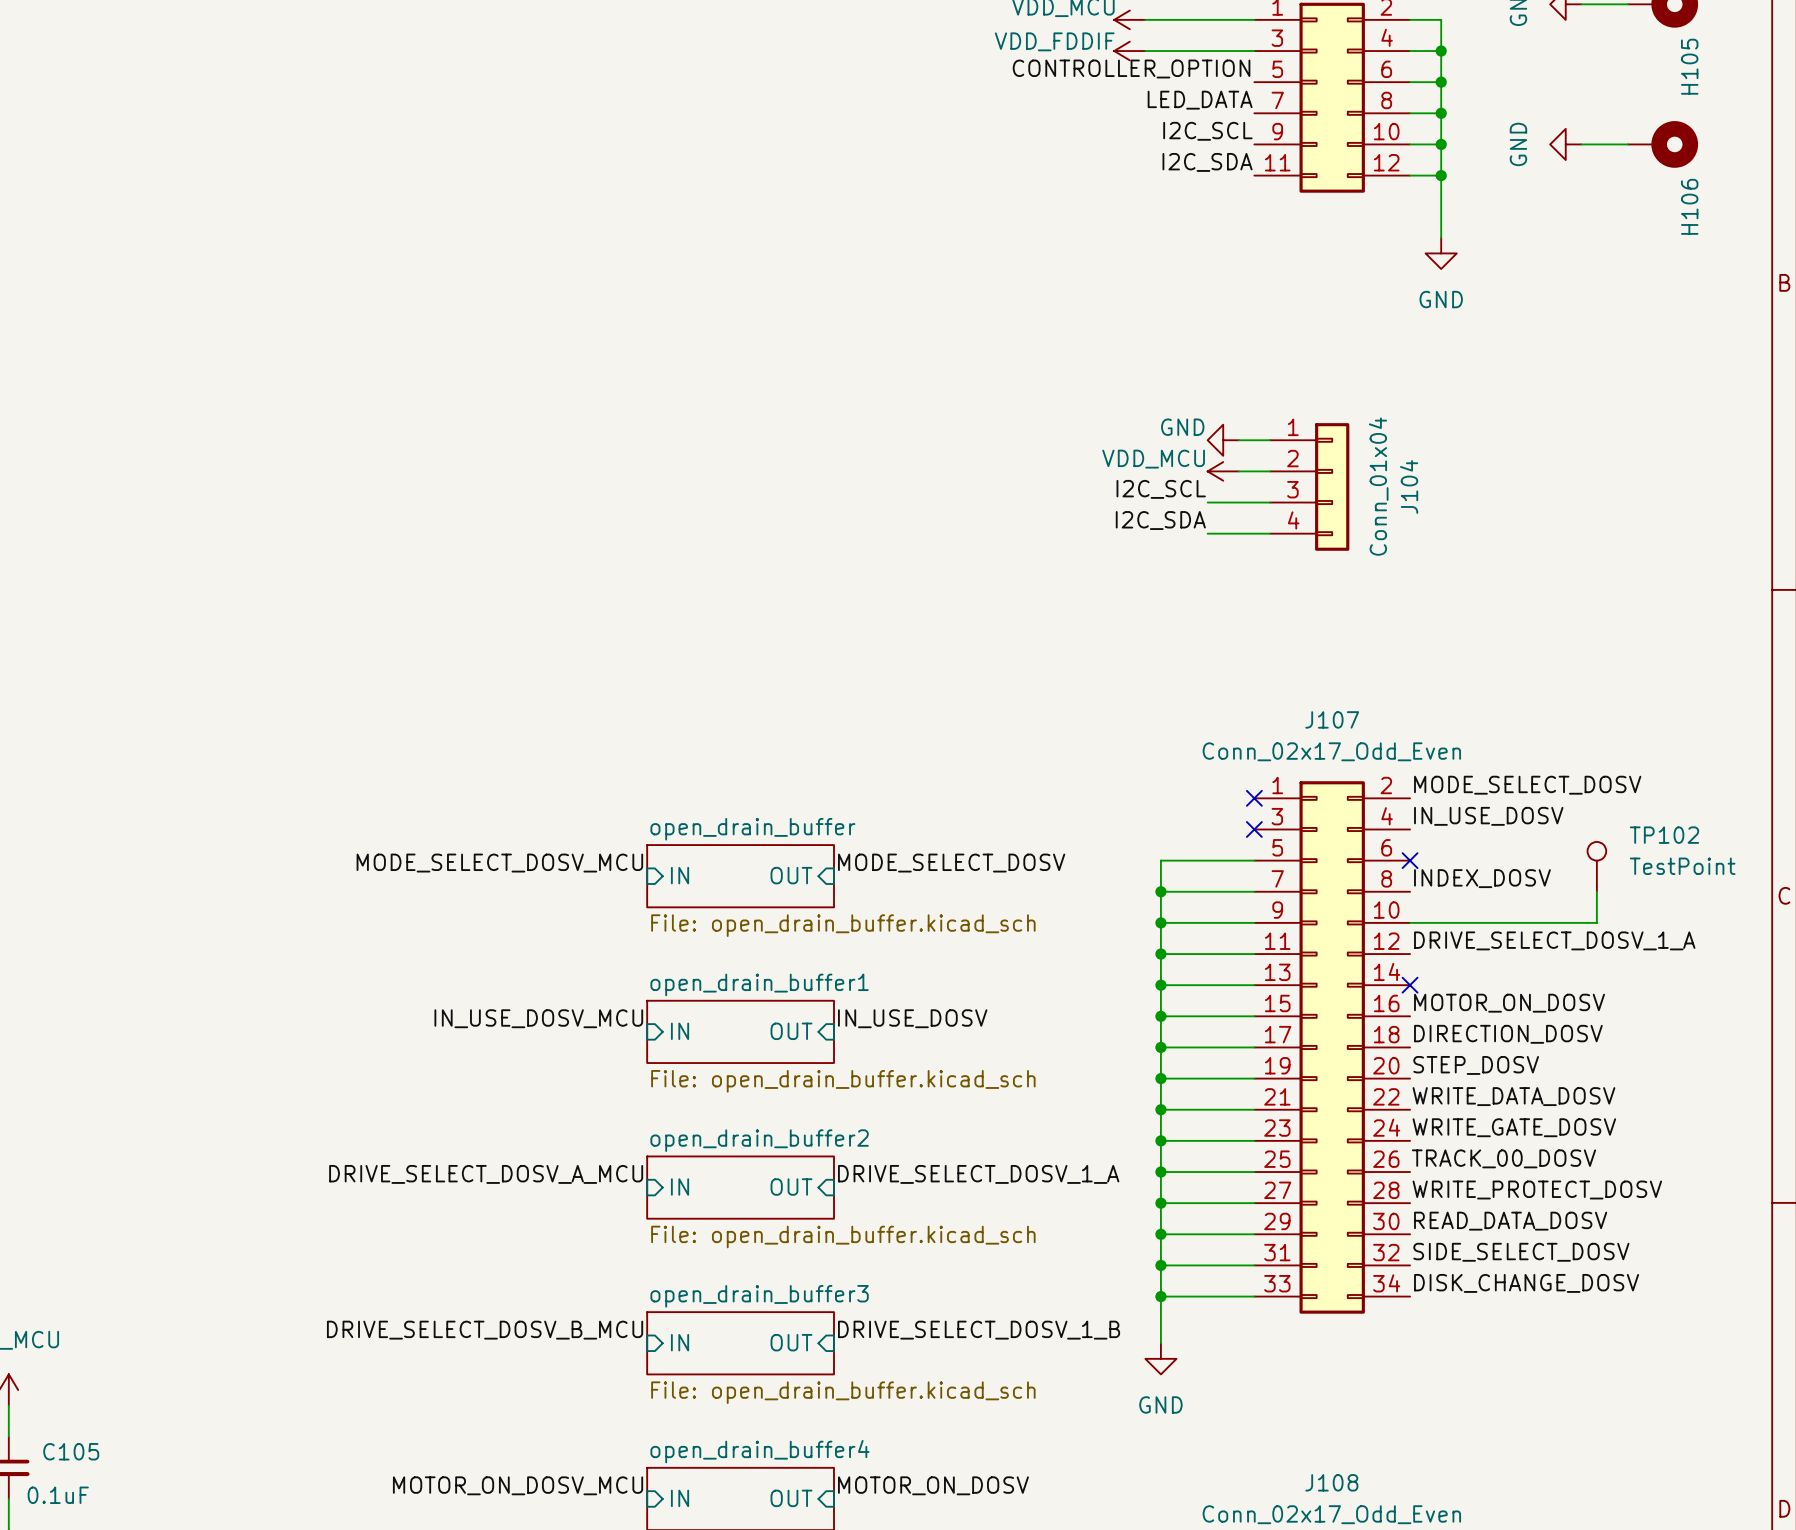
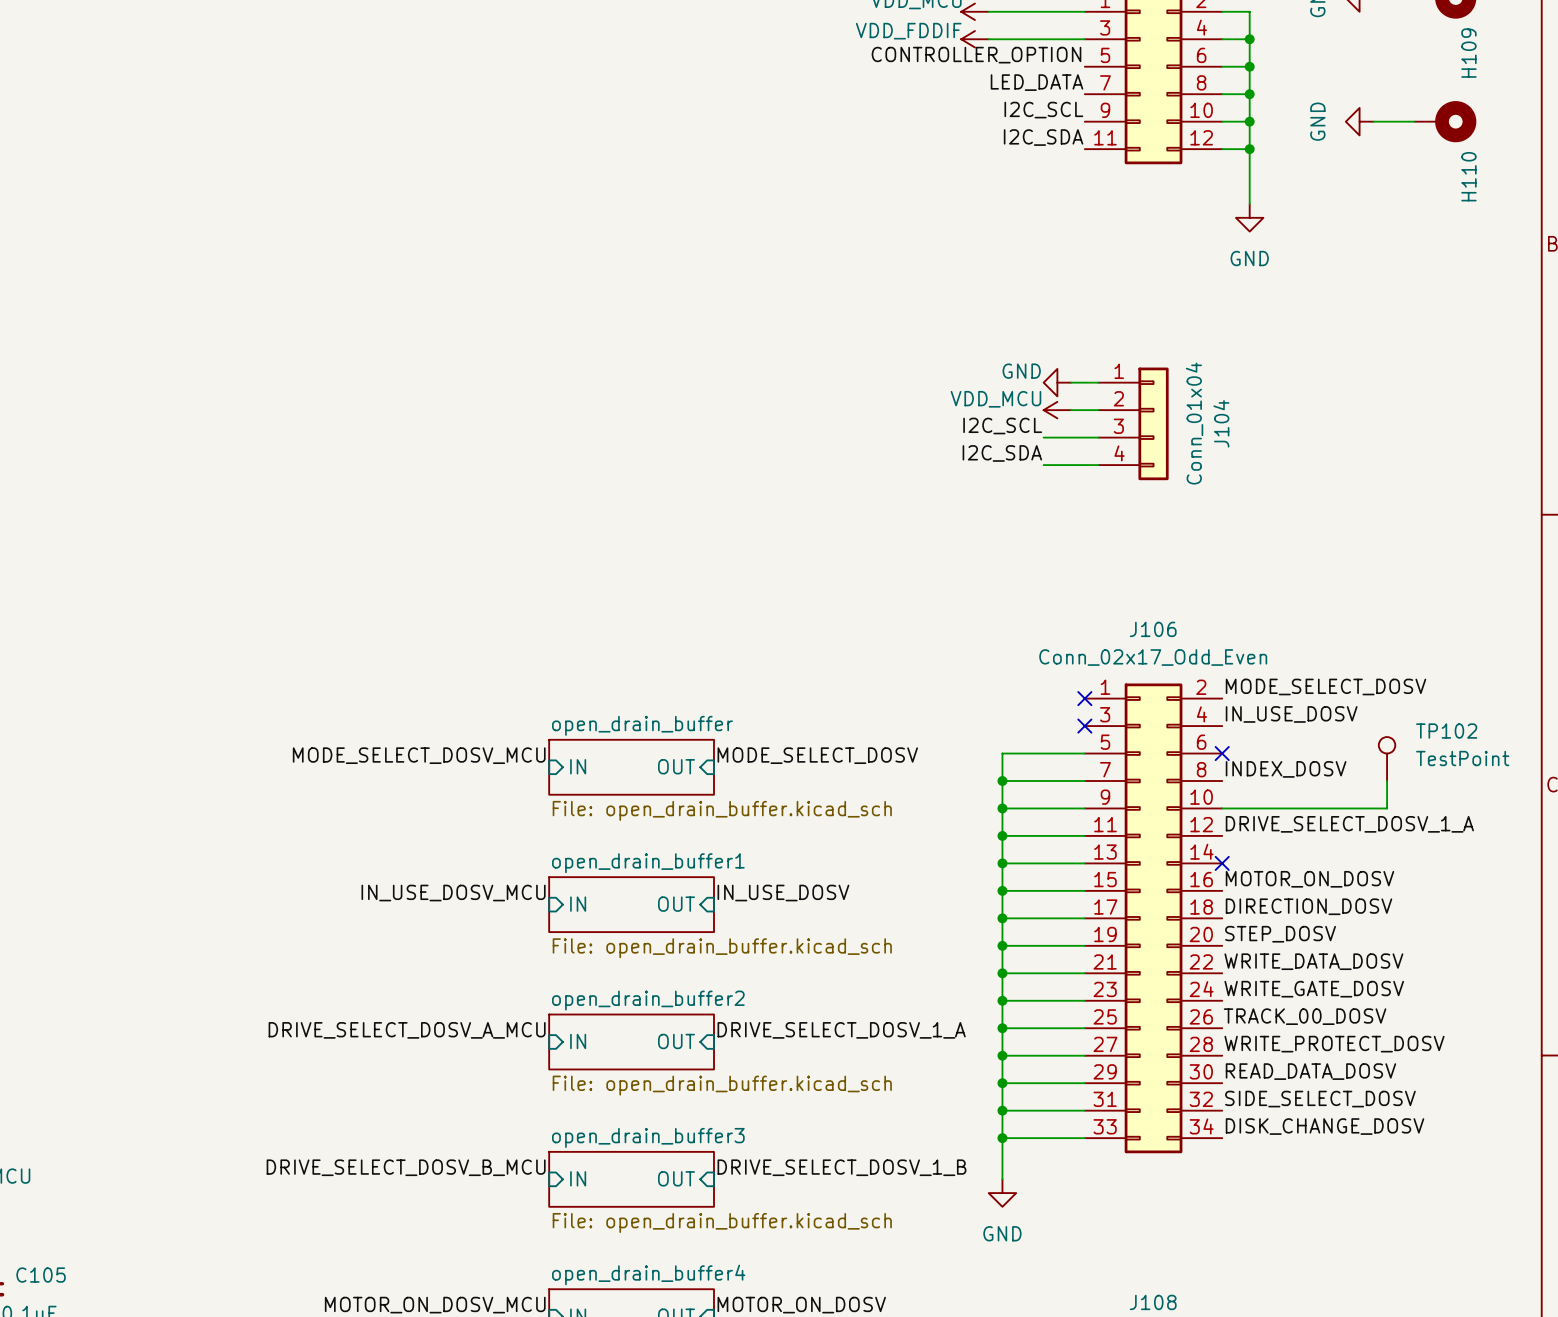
H105 name: H105 (1689, 66) -> H109 (1468, 53)
H106 name: H106 (1689, 206) -> H110 (1468, 176)
J107 name: J107 (1332, 719) -> J106 (1153, 629)

